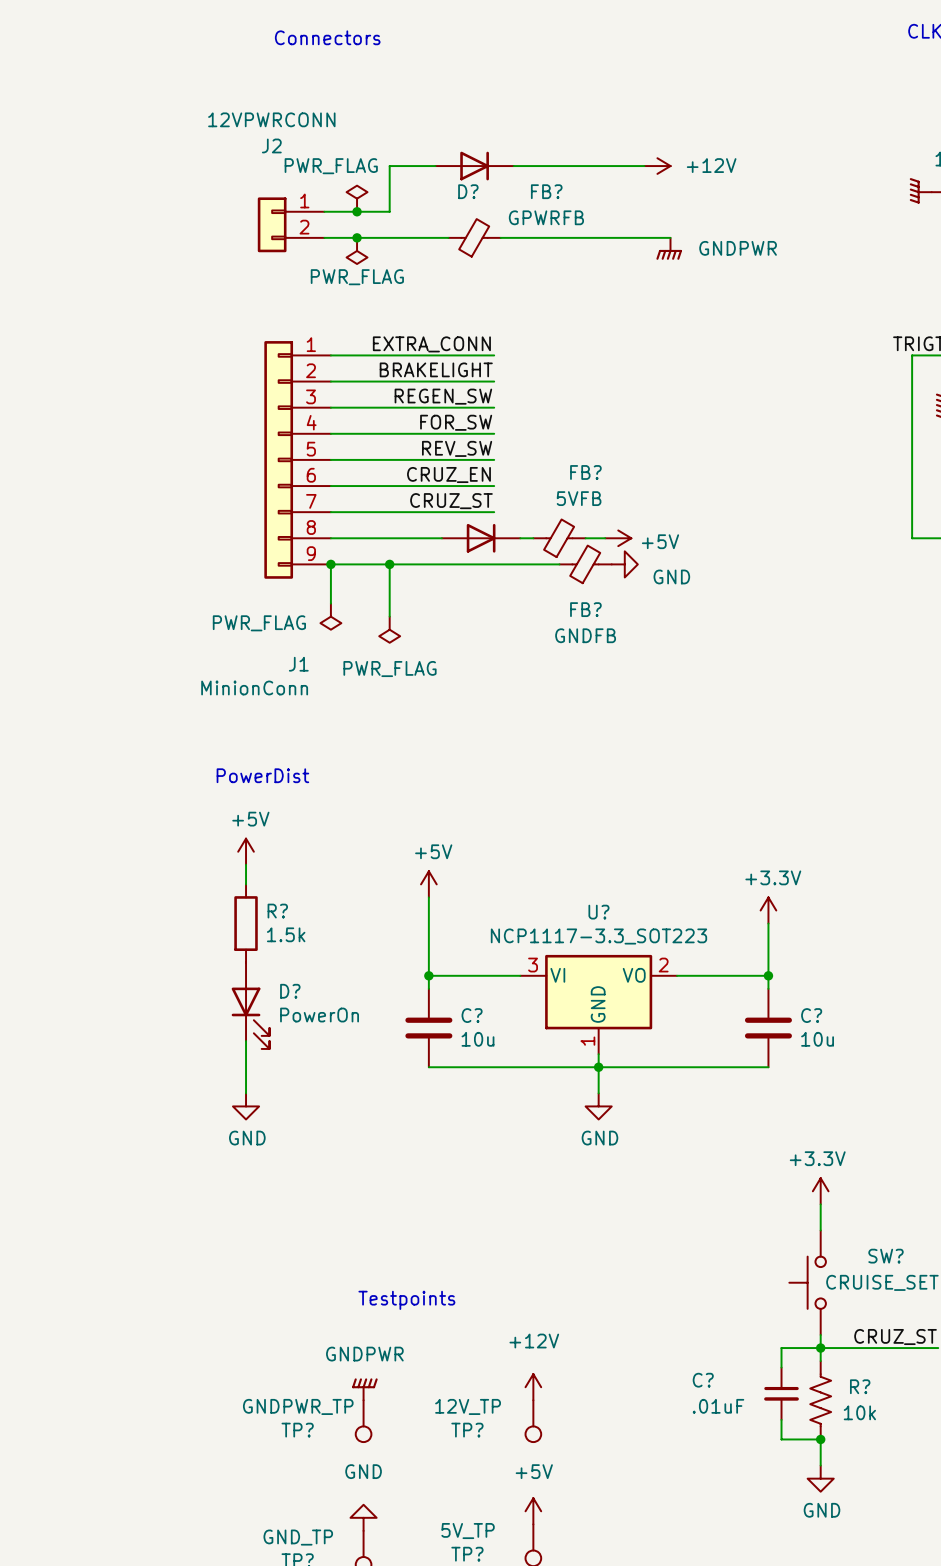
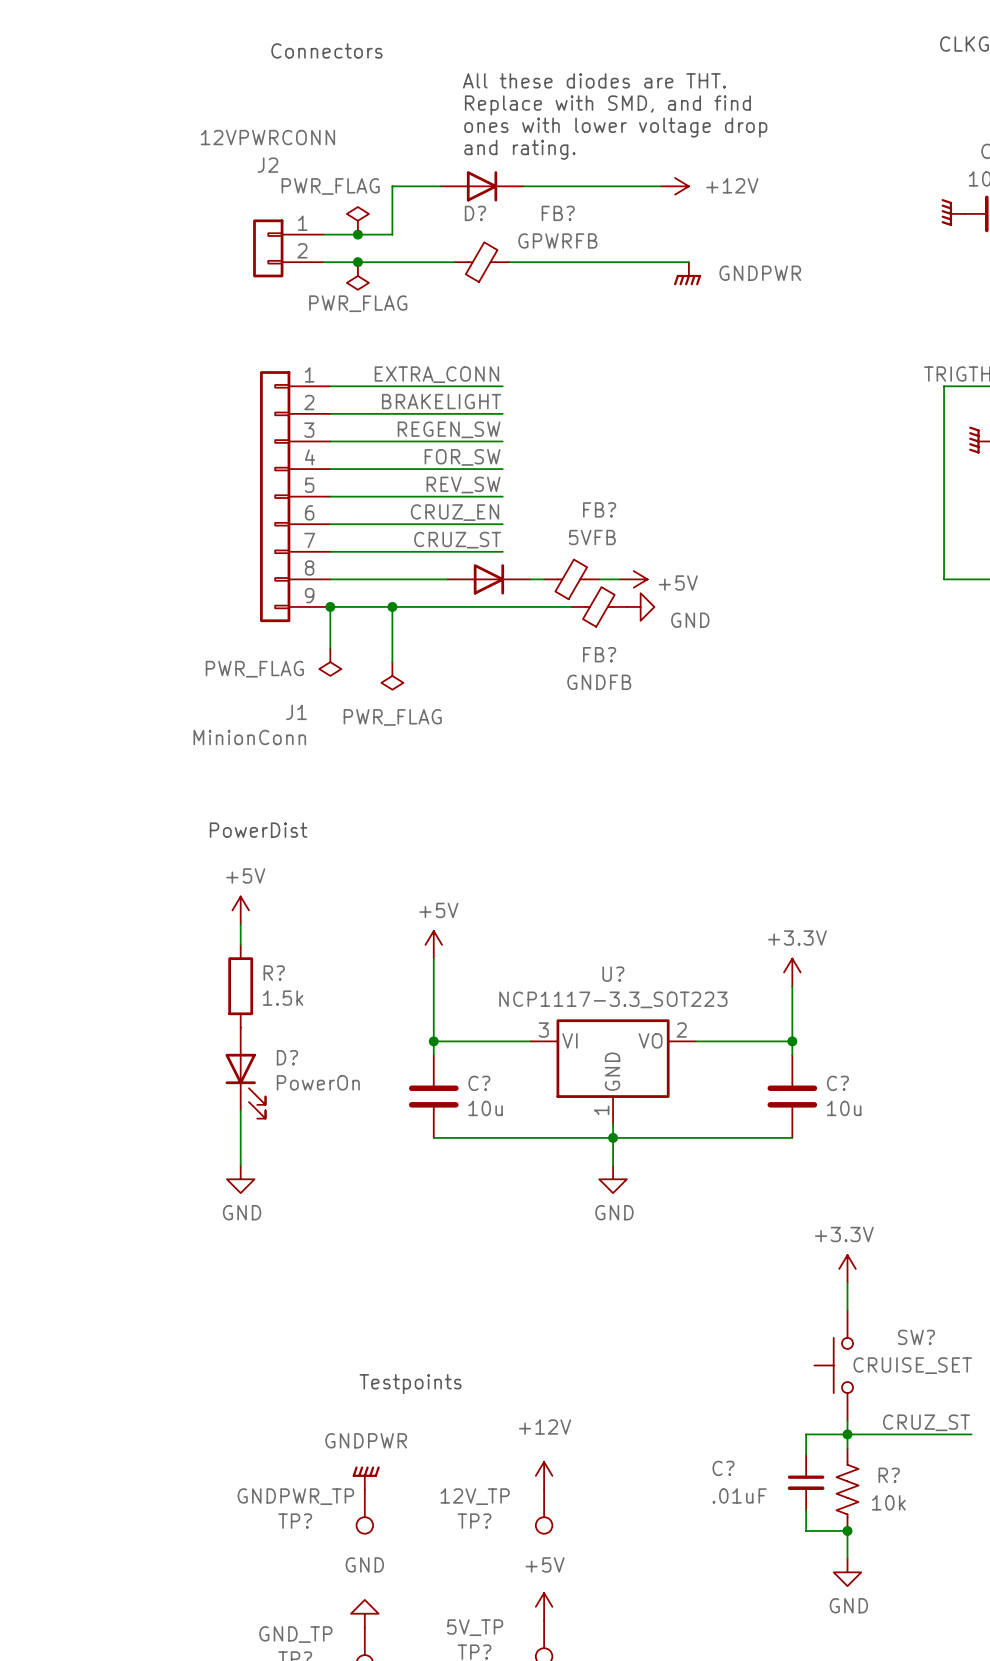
text: none -> All these diodes are THT. (594, 80)
text: none -> Replace with SMD, and find (607, 105)
text: none -> ones with lower voltage drop (615, 127)
text: none -> and rating. (519, 149)

